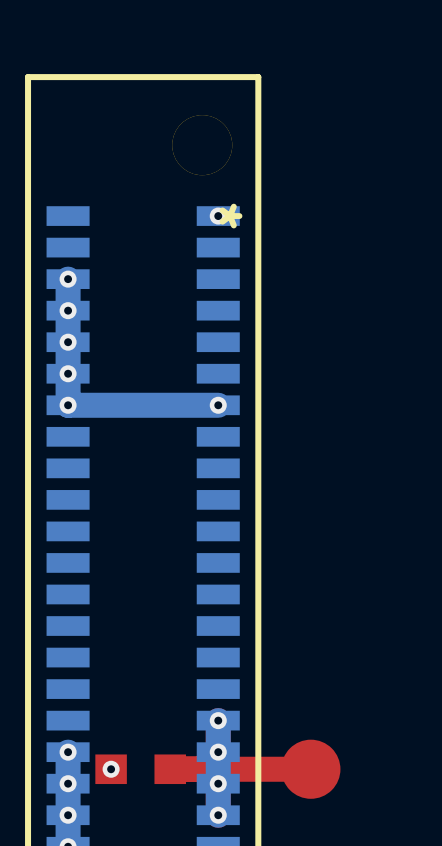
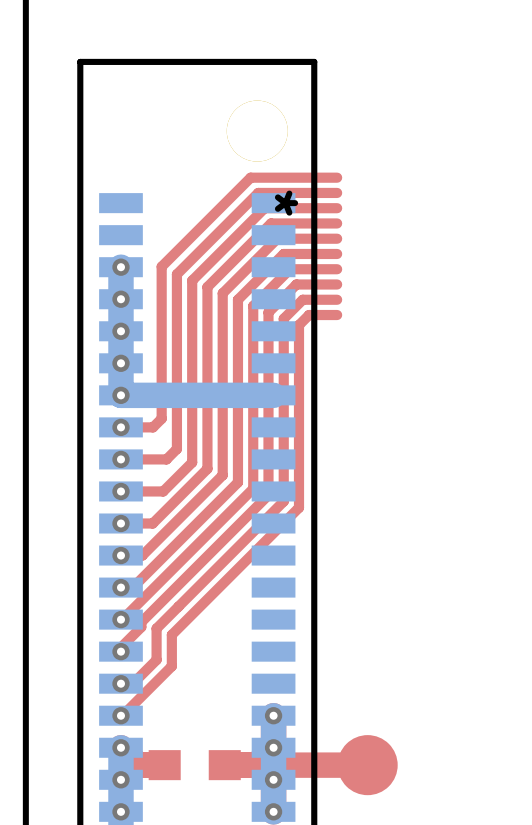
top track: none -> (337, 177) (250, 177) (161, 266) (161, 418) (153, 427) (120, 427)
top track: none -> (337, 192) (258, 192) (176, 274) (176, 449) (166, 459) (120, 459)
via: (218, 216) -> none
top track: none -> (337, 208) (264, 208) (192, 280) (192, 462) (163, 491) (120, 491)
top track: none -> (337, 223) (271, 223) (207, 287) (207, 468) (152, 523) (120, 523)
top track: none -> (337, 238) (277, 238) (222, 293) (222, 475) (142, 555) (120, 555)
top track: none -> (337, 253) (283, 253) (237, 299) (237, 482) (132, 587) (120, 587)
top track: none -> (337, 269) (290, 269) (253, 306) (253, 488) (120, 619)
top track: none -> (337, 284) (296, 284) (268, 312) (268, 495) (141, 622) (141, 627) (120, 647) (120, 651)
top track: none -> (337, 299) (302, 299) (283, 318) (283, 501) (156, 628) (156, 659) (132, 683) (120, 683)
top track: none -> (337, 315) (309, 315) (299, 325) (299, 507) (171, 634) (171, 666) (120, 715)
via: (218, 405) -> none
via: none -> (120, 427)
via: none -> (120, 459)
via: none -> (120, 491)
via: none -> (120, 523)
via: none -> (120, 555)
via: none -> (120, 587)
via: none -> (120, 619)
via: none -> (120, 651)
via: none -> (120, 683)
via: none -> (120, 715)
via: (111, 769) -> none

